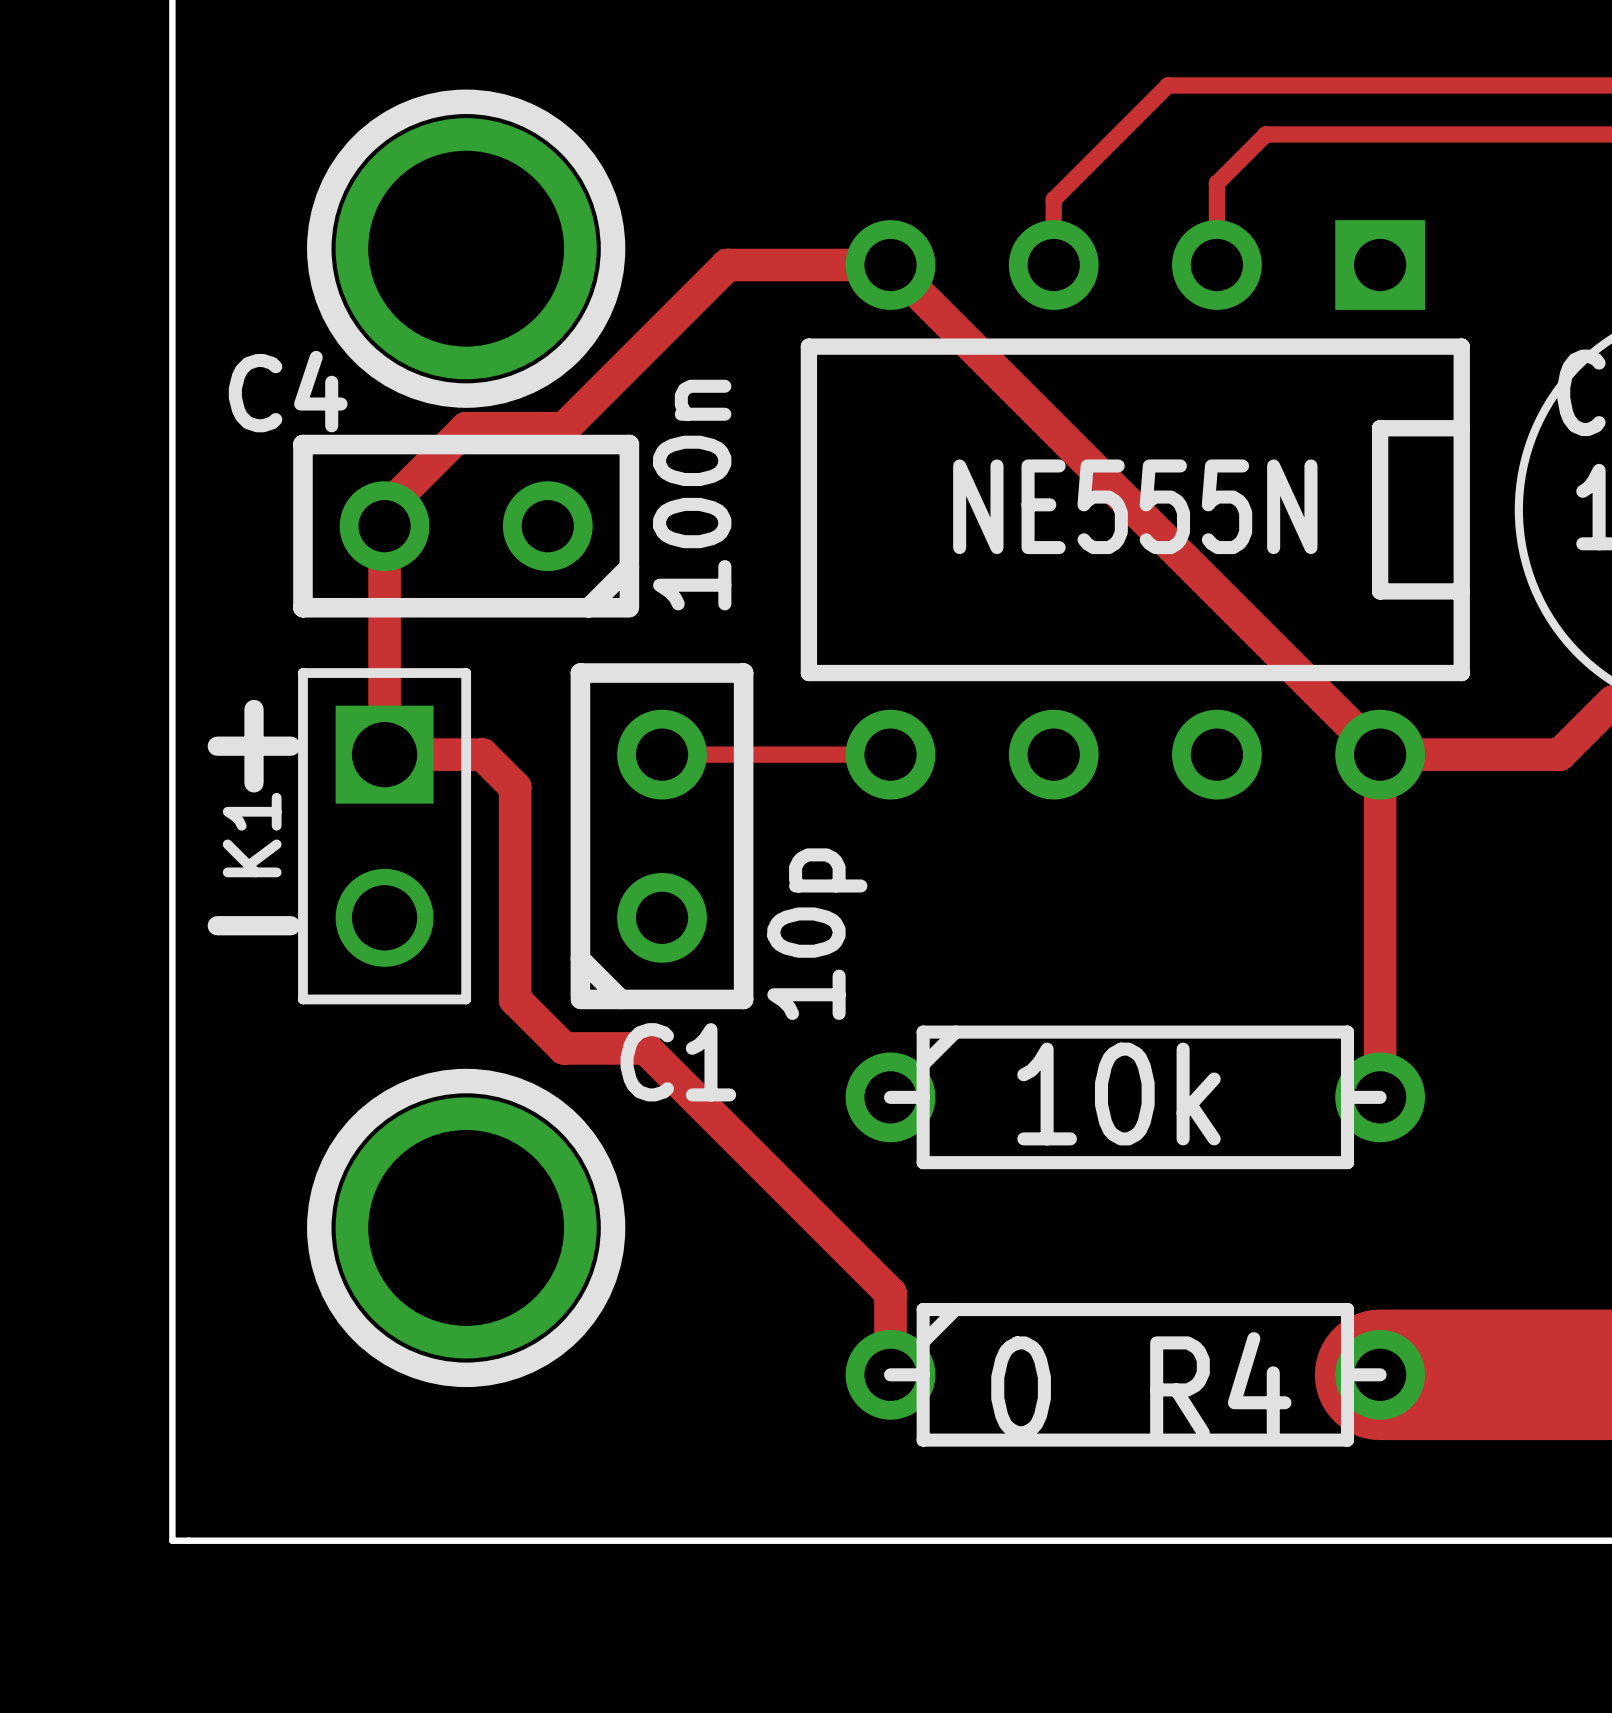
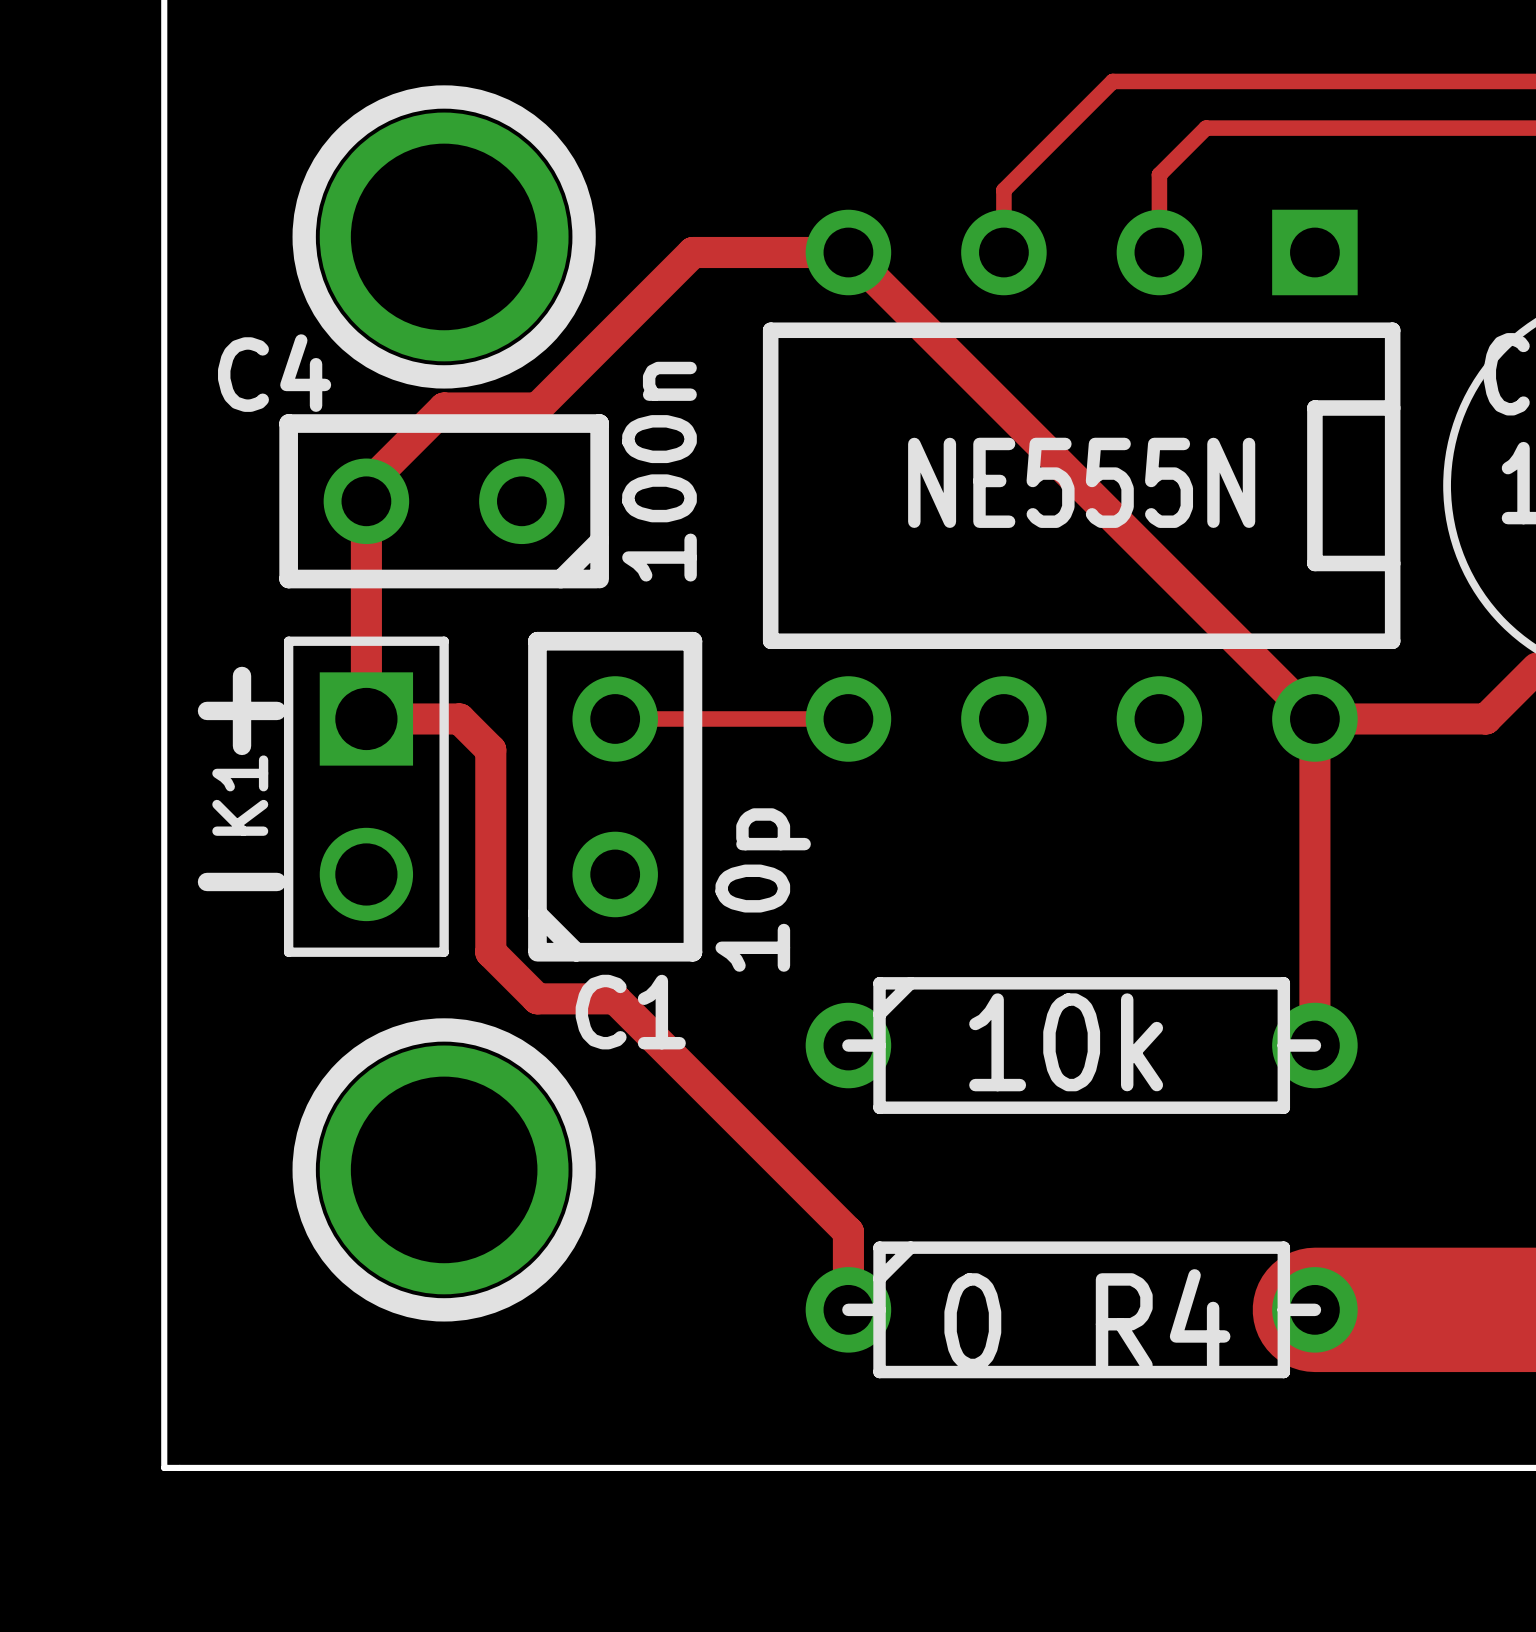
C1 position: (662, 836) -> (615, 796)

